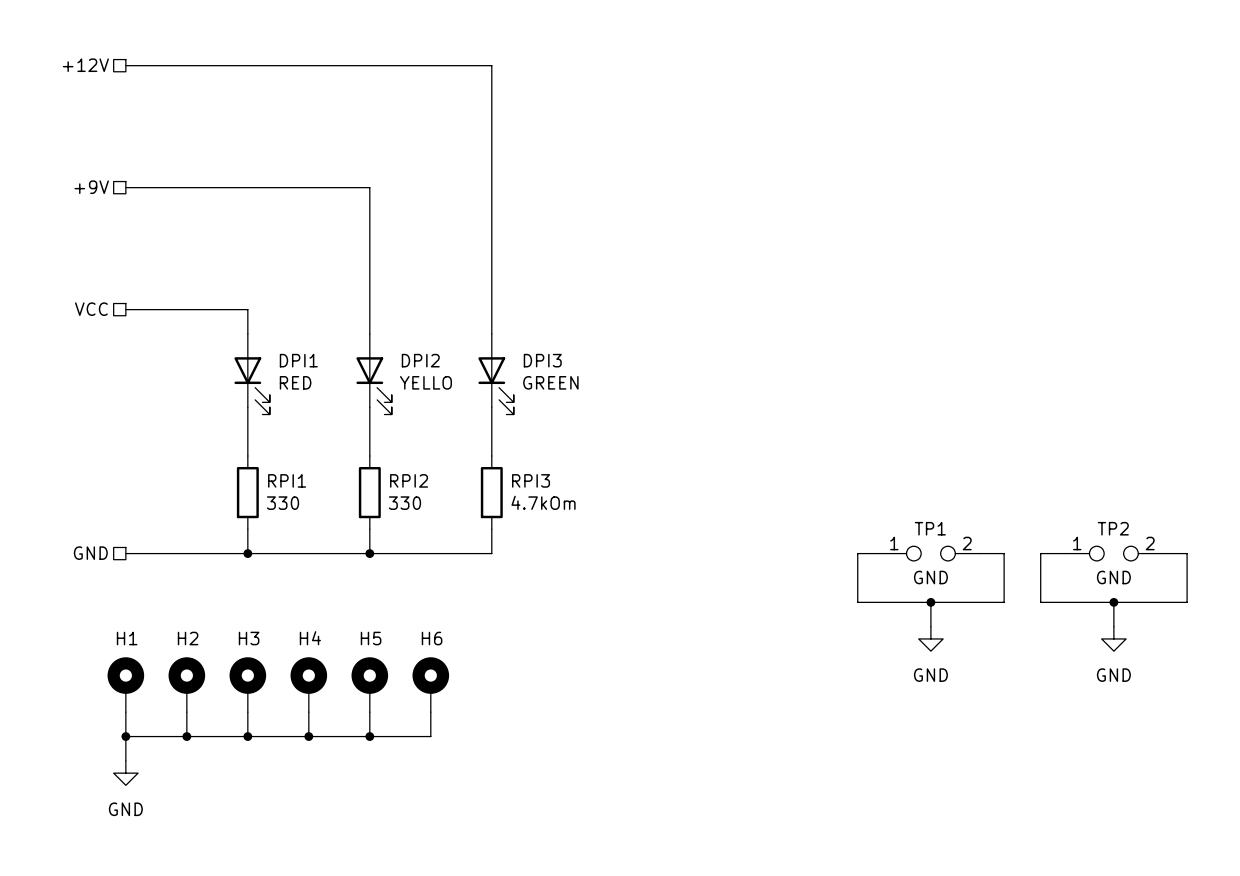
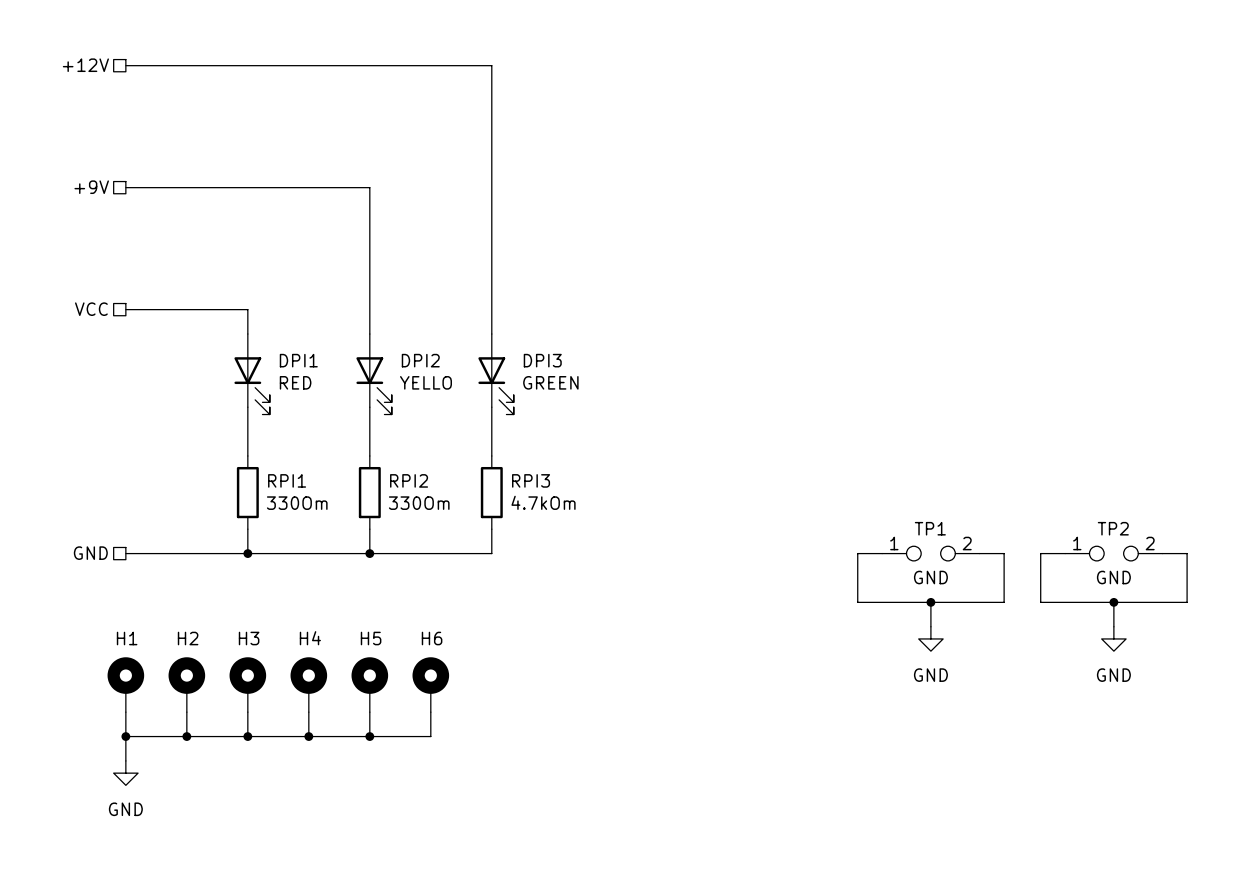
RPI1 value: 330 (283, 503) -> 330Om (297, 503)
RPI2 value: 330 (404, 503) -> 330Om (419, 503)

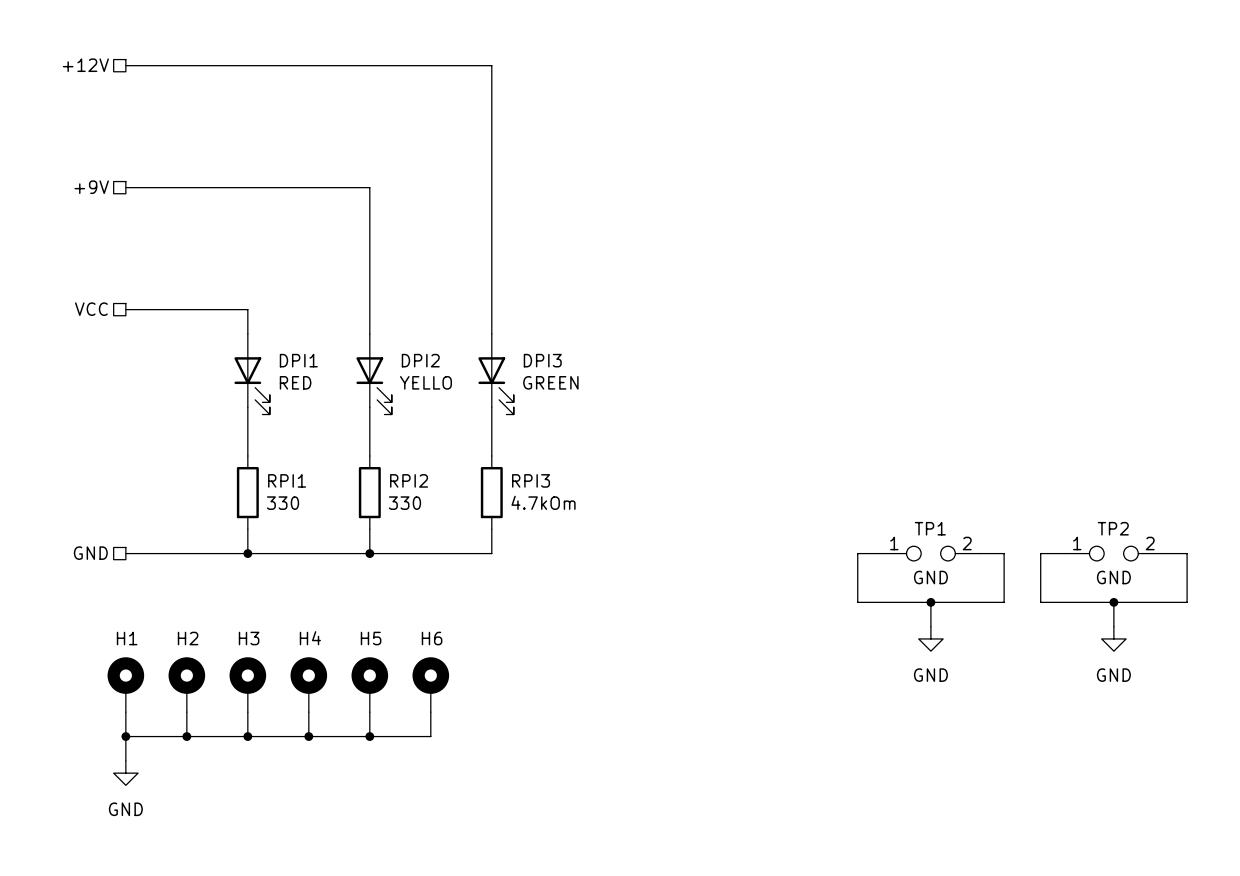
RPI1 value: 330Om (297, 503) -> 330 (283, 503)
RPI2 value: 330Om (419, 503) -> 330 (404, 503)

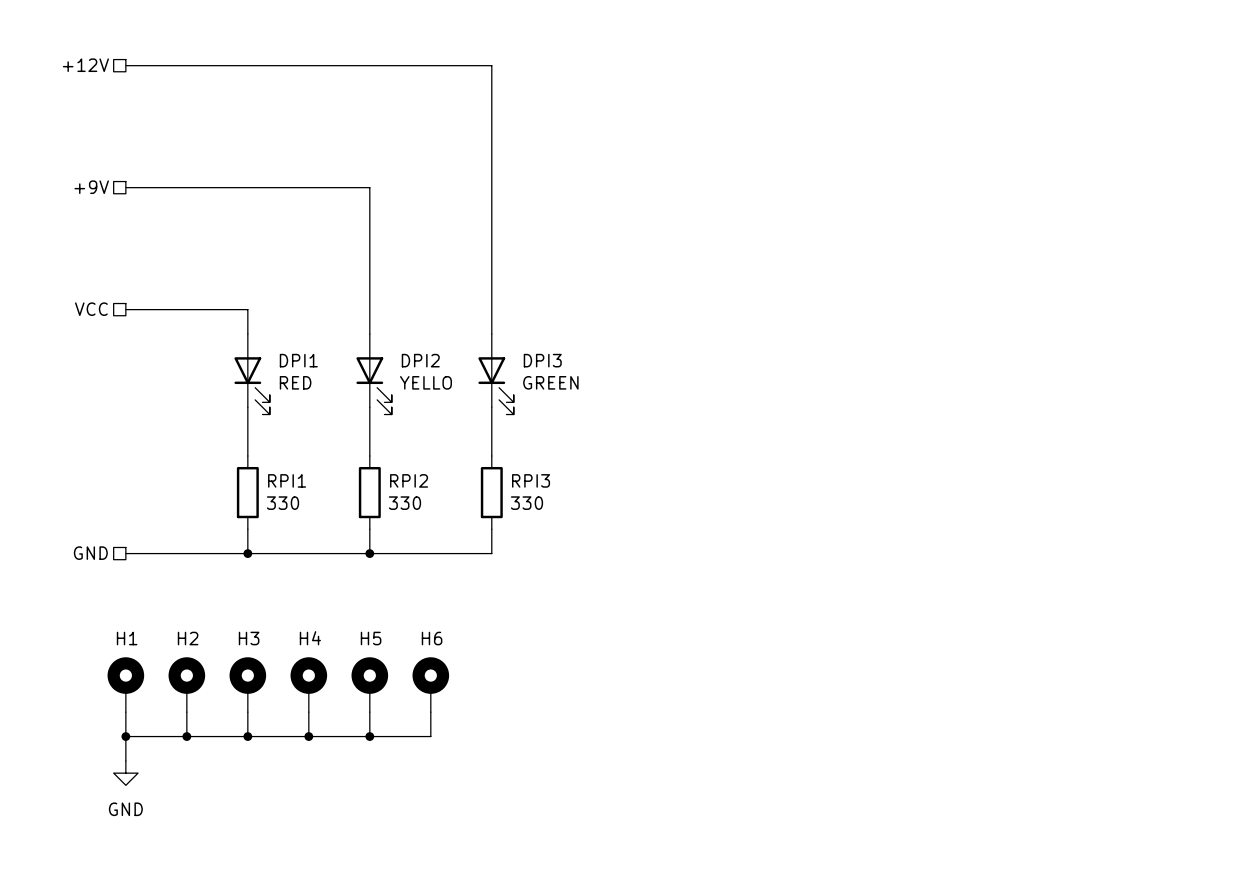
RPI3 value: 4.7kOm (543, 502) -> 330 (526, 503)
wire: (882, 553) (857, 553) (857, 602) (1004, 602) (1004, 553) (979, 553) -> none
TP1: GND (930, 553) -> none
wire: (1065, 553) (1040, 553) (1040, 602) (1187, 602) (1187, 553) (1162, 553) -> none
TP2: GND (1113, 553) -> none
wire: (930, 602) (930, 626) -> none
junction: (930, 602) -> none
wire: (1113, 602) (1113, 626) -> none
junction: (1113, 602) -> none
power symbol: GND (930, 638) -> none
power symbol: GND (1113, 638) -> none

